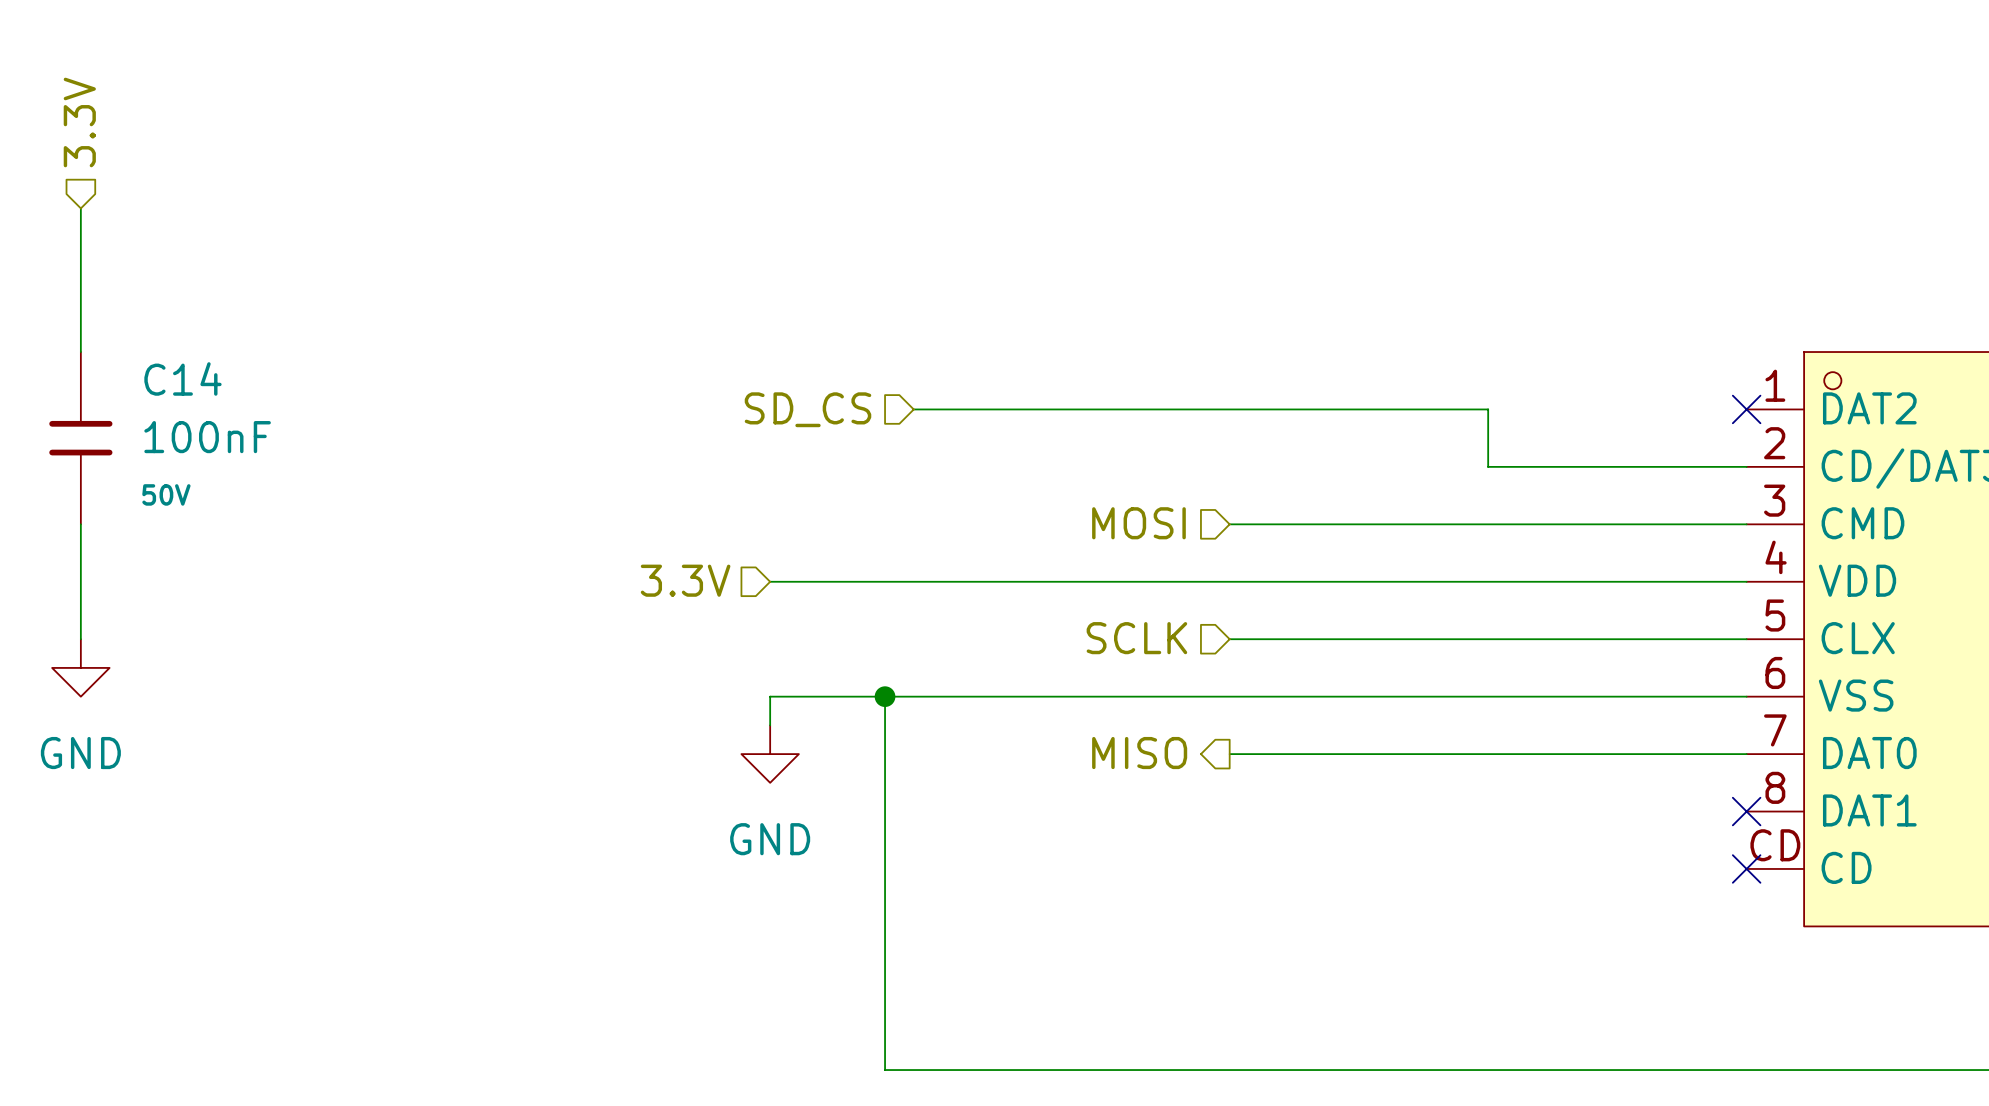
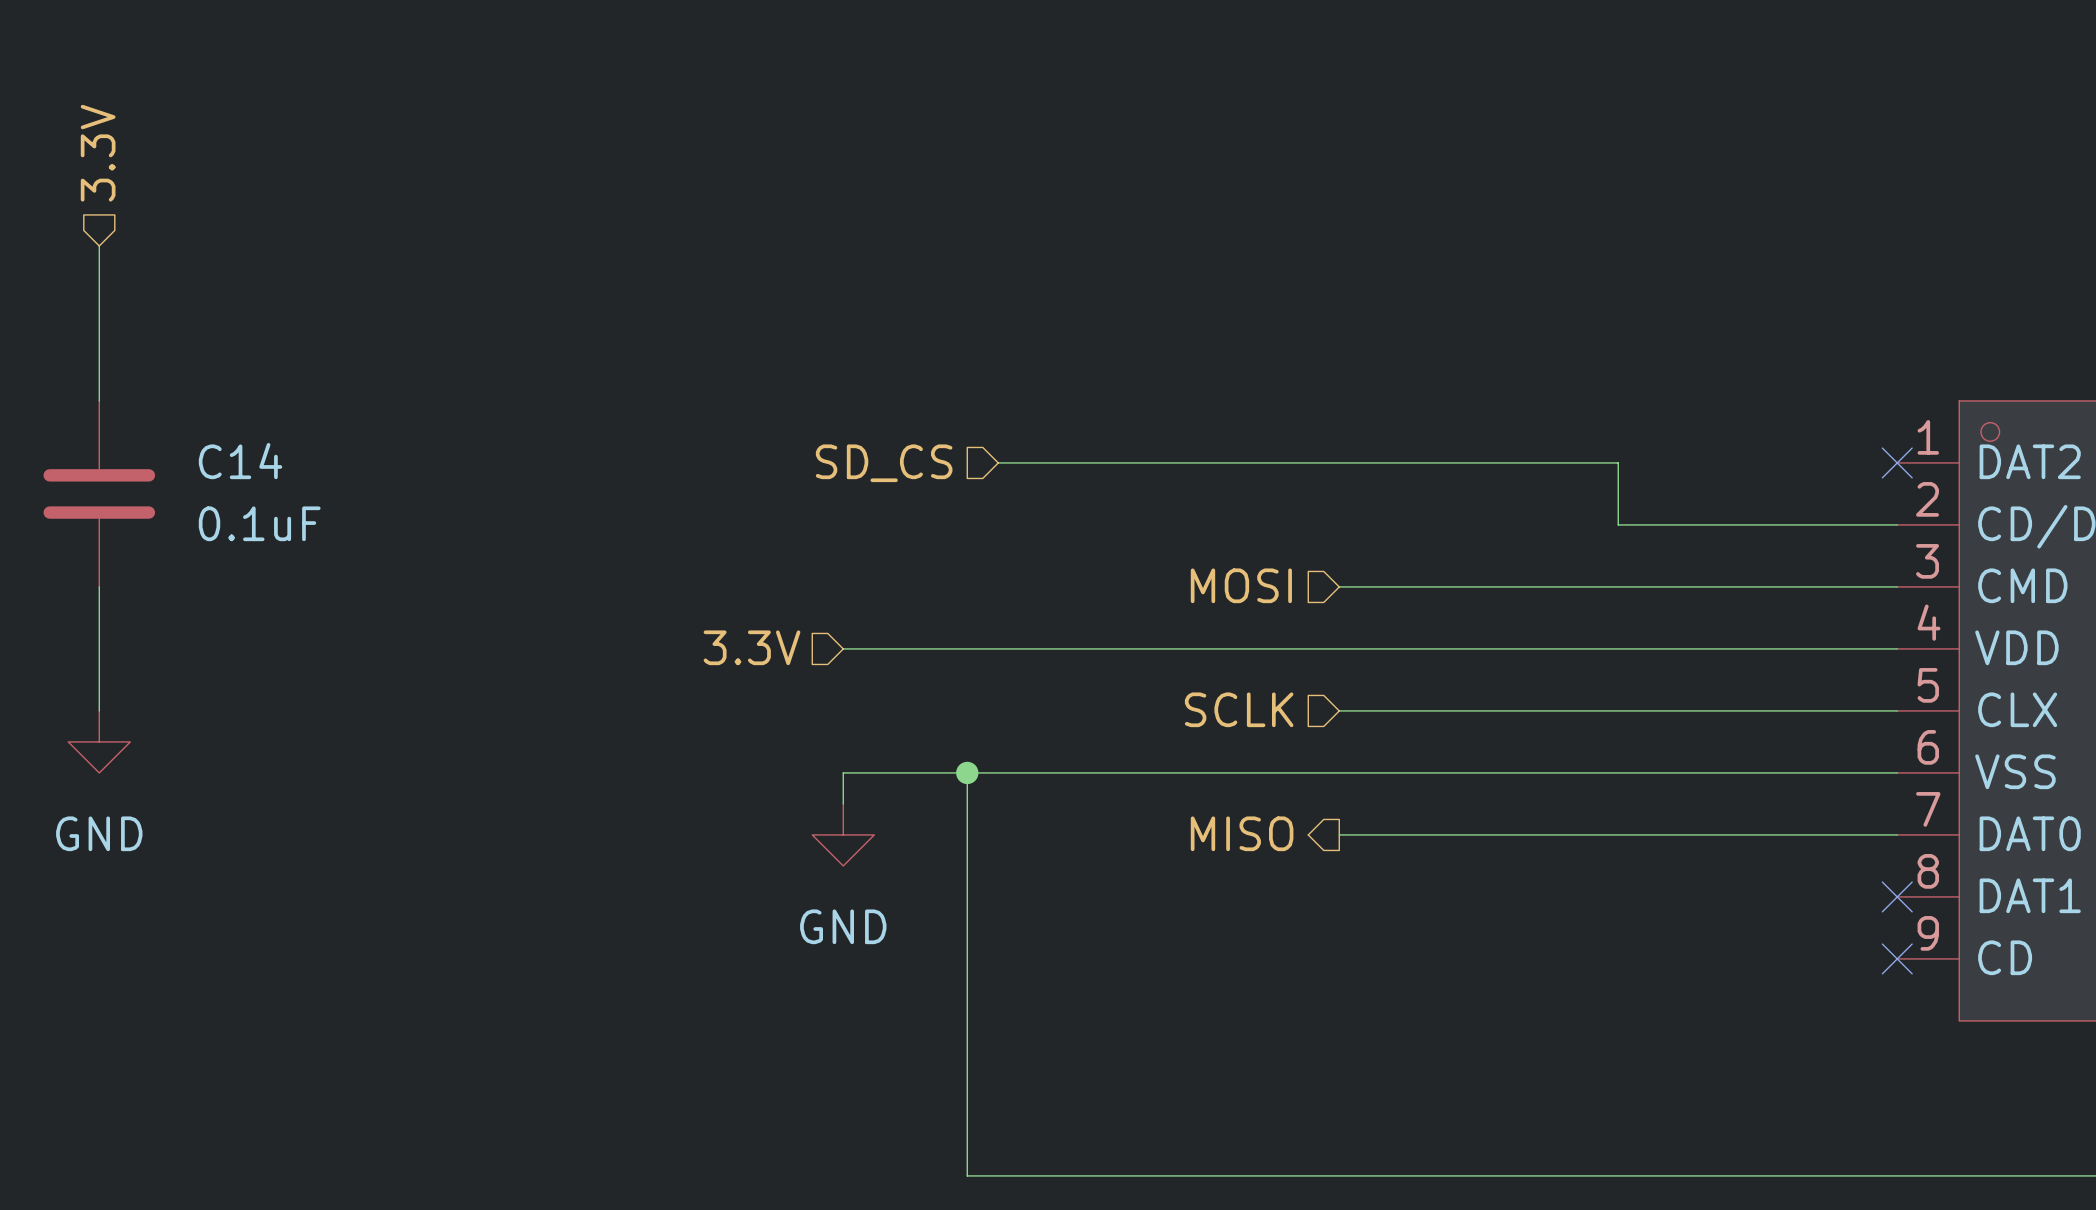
C14 symbol: [49, 352, 113, 525] -> [43, 400, 156, 587]
C14 name position: C14 (182, 378) -> C14 (240, 461)
C14 value: 100nF (207, 437) -> 0.1uF (259, 523)
C14 text: 50V (166, 494) -> none
part pin number: CD (1775, 845) -> 9 (1928, 933)

